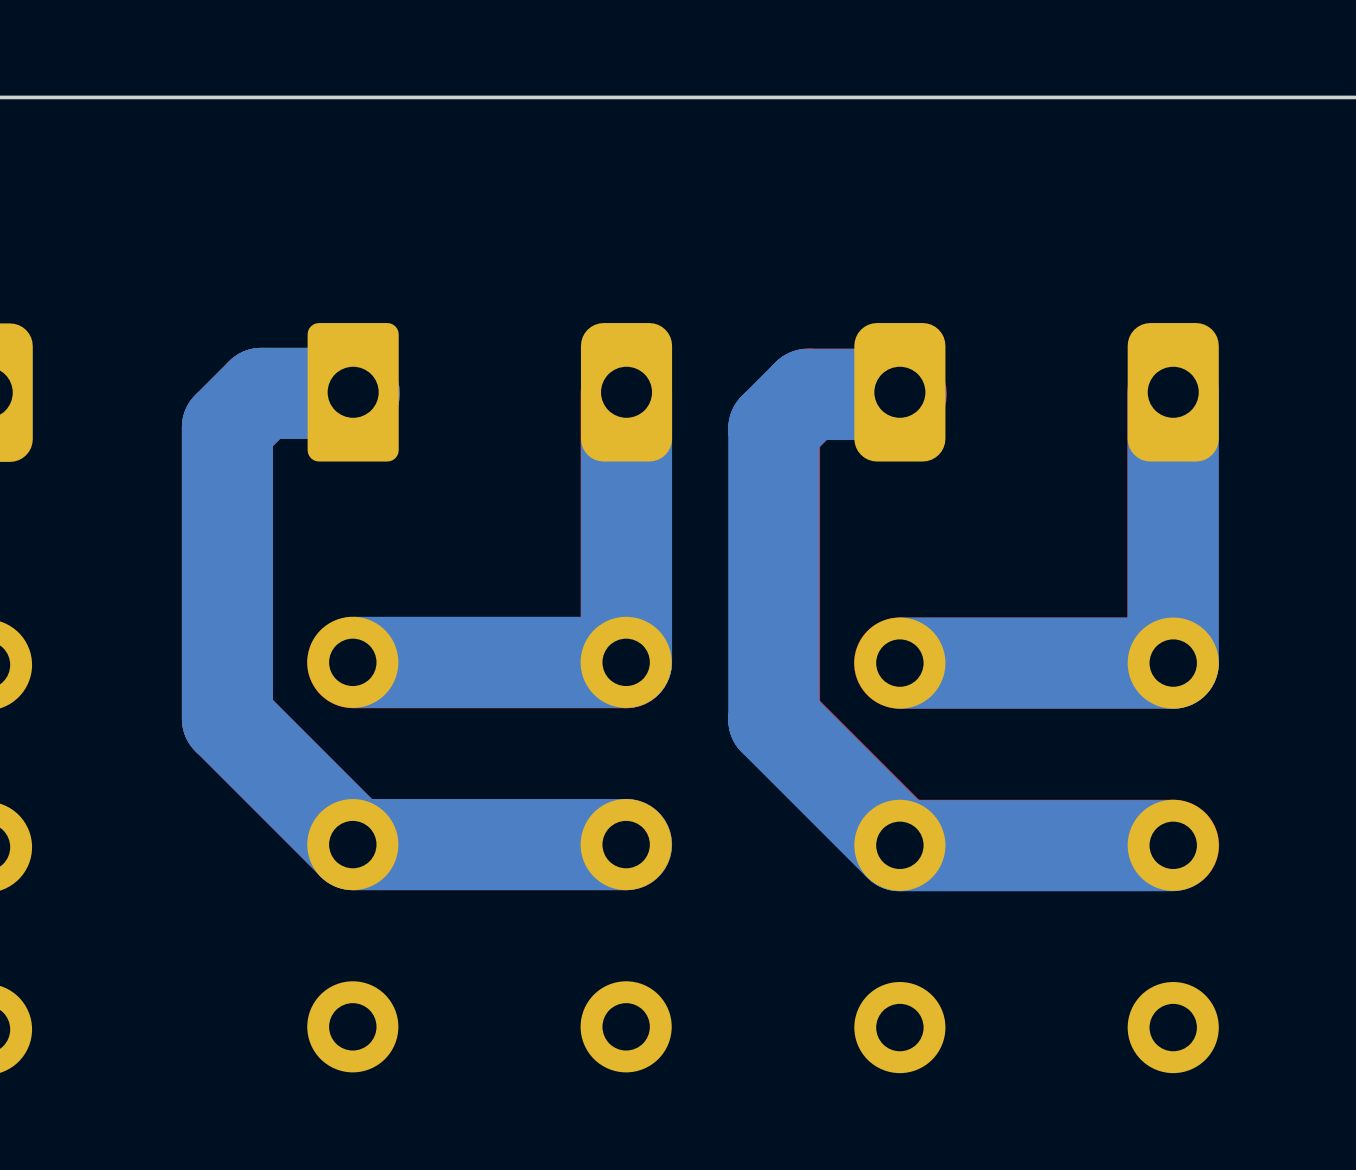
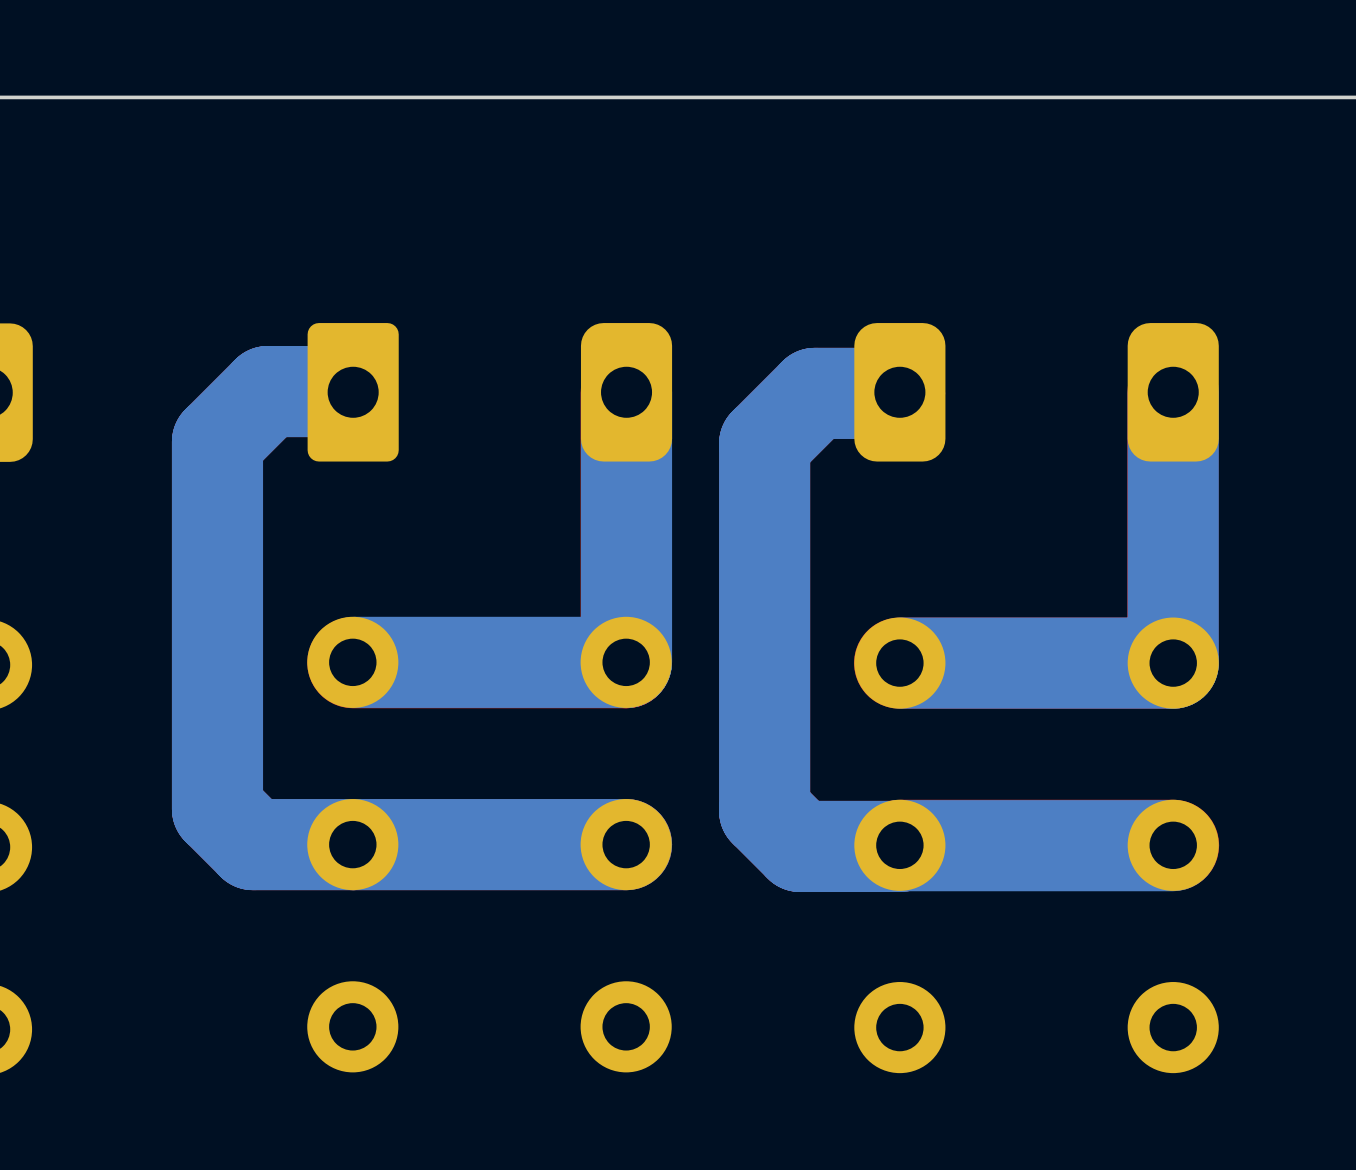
bottom track: (354, 393) (261, 393) (227, 427) (227, 718) (353, 844) -> (352, 391) (267, 391) (217, 441) (217, 809) (252, 844) (353, 844)
bottom track: (900, 394) (807, 394) (773, 428) (773, 719) (899, 845) -> (899, 393) (814, 393) (764, 443) (764, 811) (799, 846) (900, 846)

